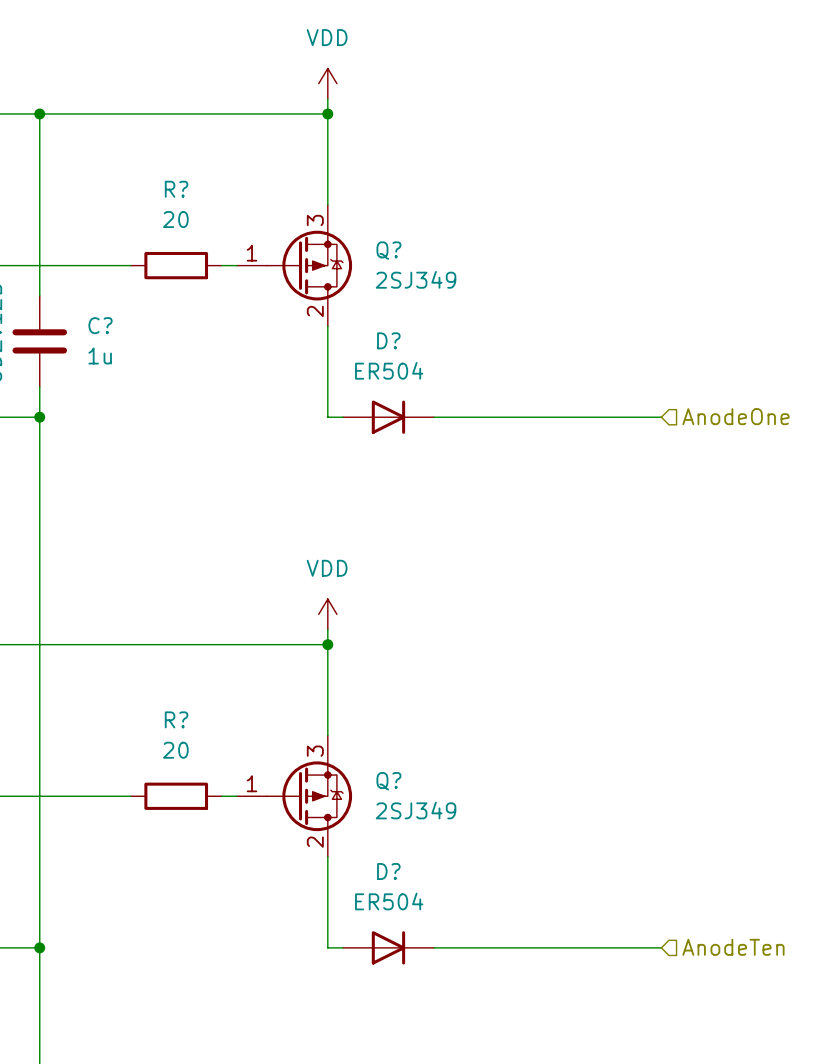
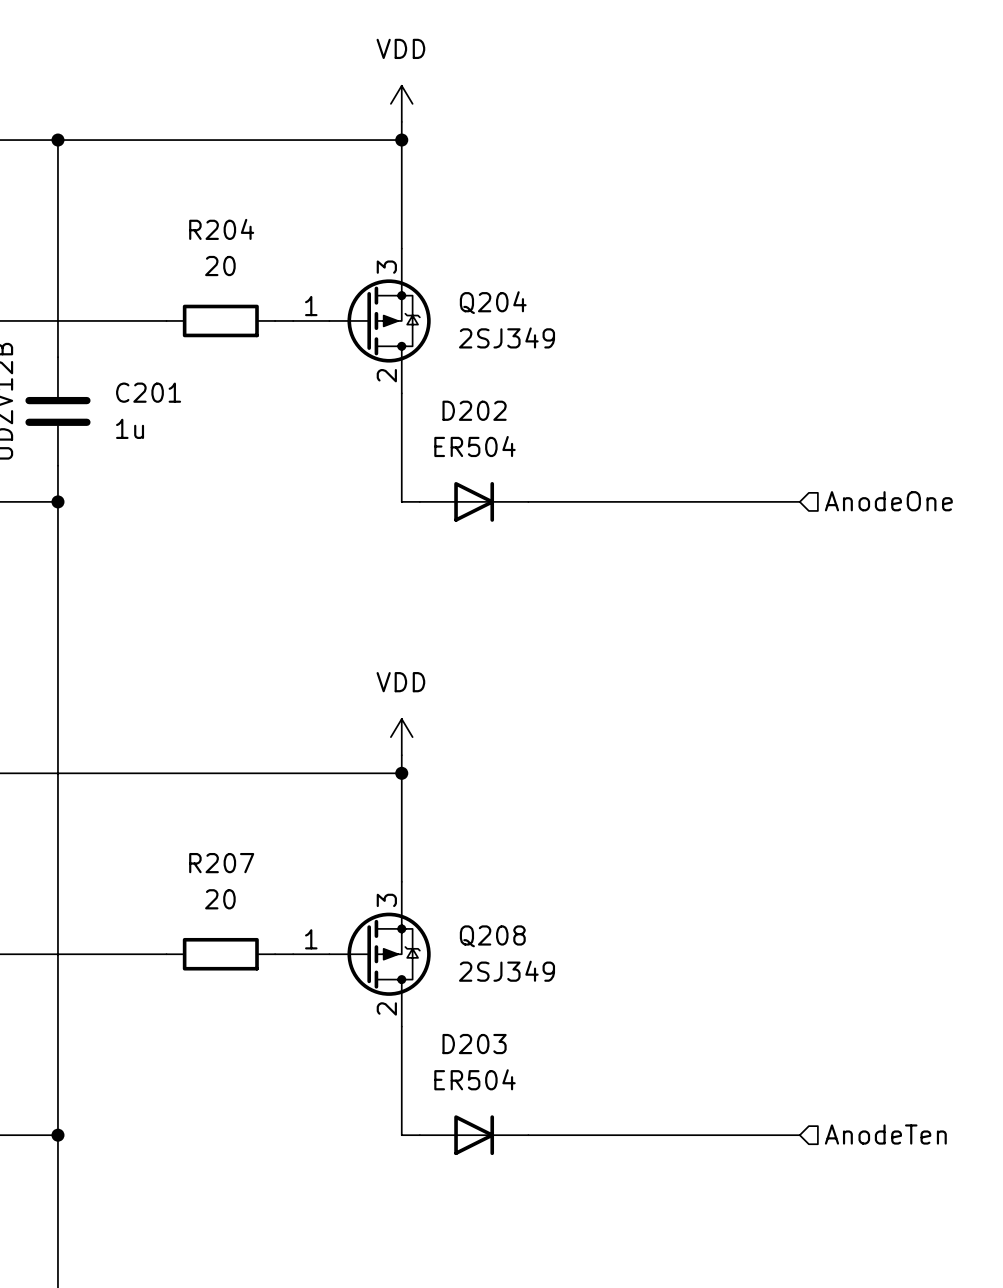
R? name: R? (176, 189) -> R204 (221, 229)
Q? name: Q? (388, 250) -> Q204 (493, 302)
C? name: C? (100, 325) -> C201 (148, 392)
D? name: D? (388, 340) -> D202 (474, 410)
R? name: R? (176, 719) -> R207 (221, 863)
Q? name: Q? (388, 781) -> Q208 (492, 936)
D? name: D? (388, 871) -> D203 (474, 1044)

